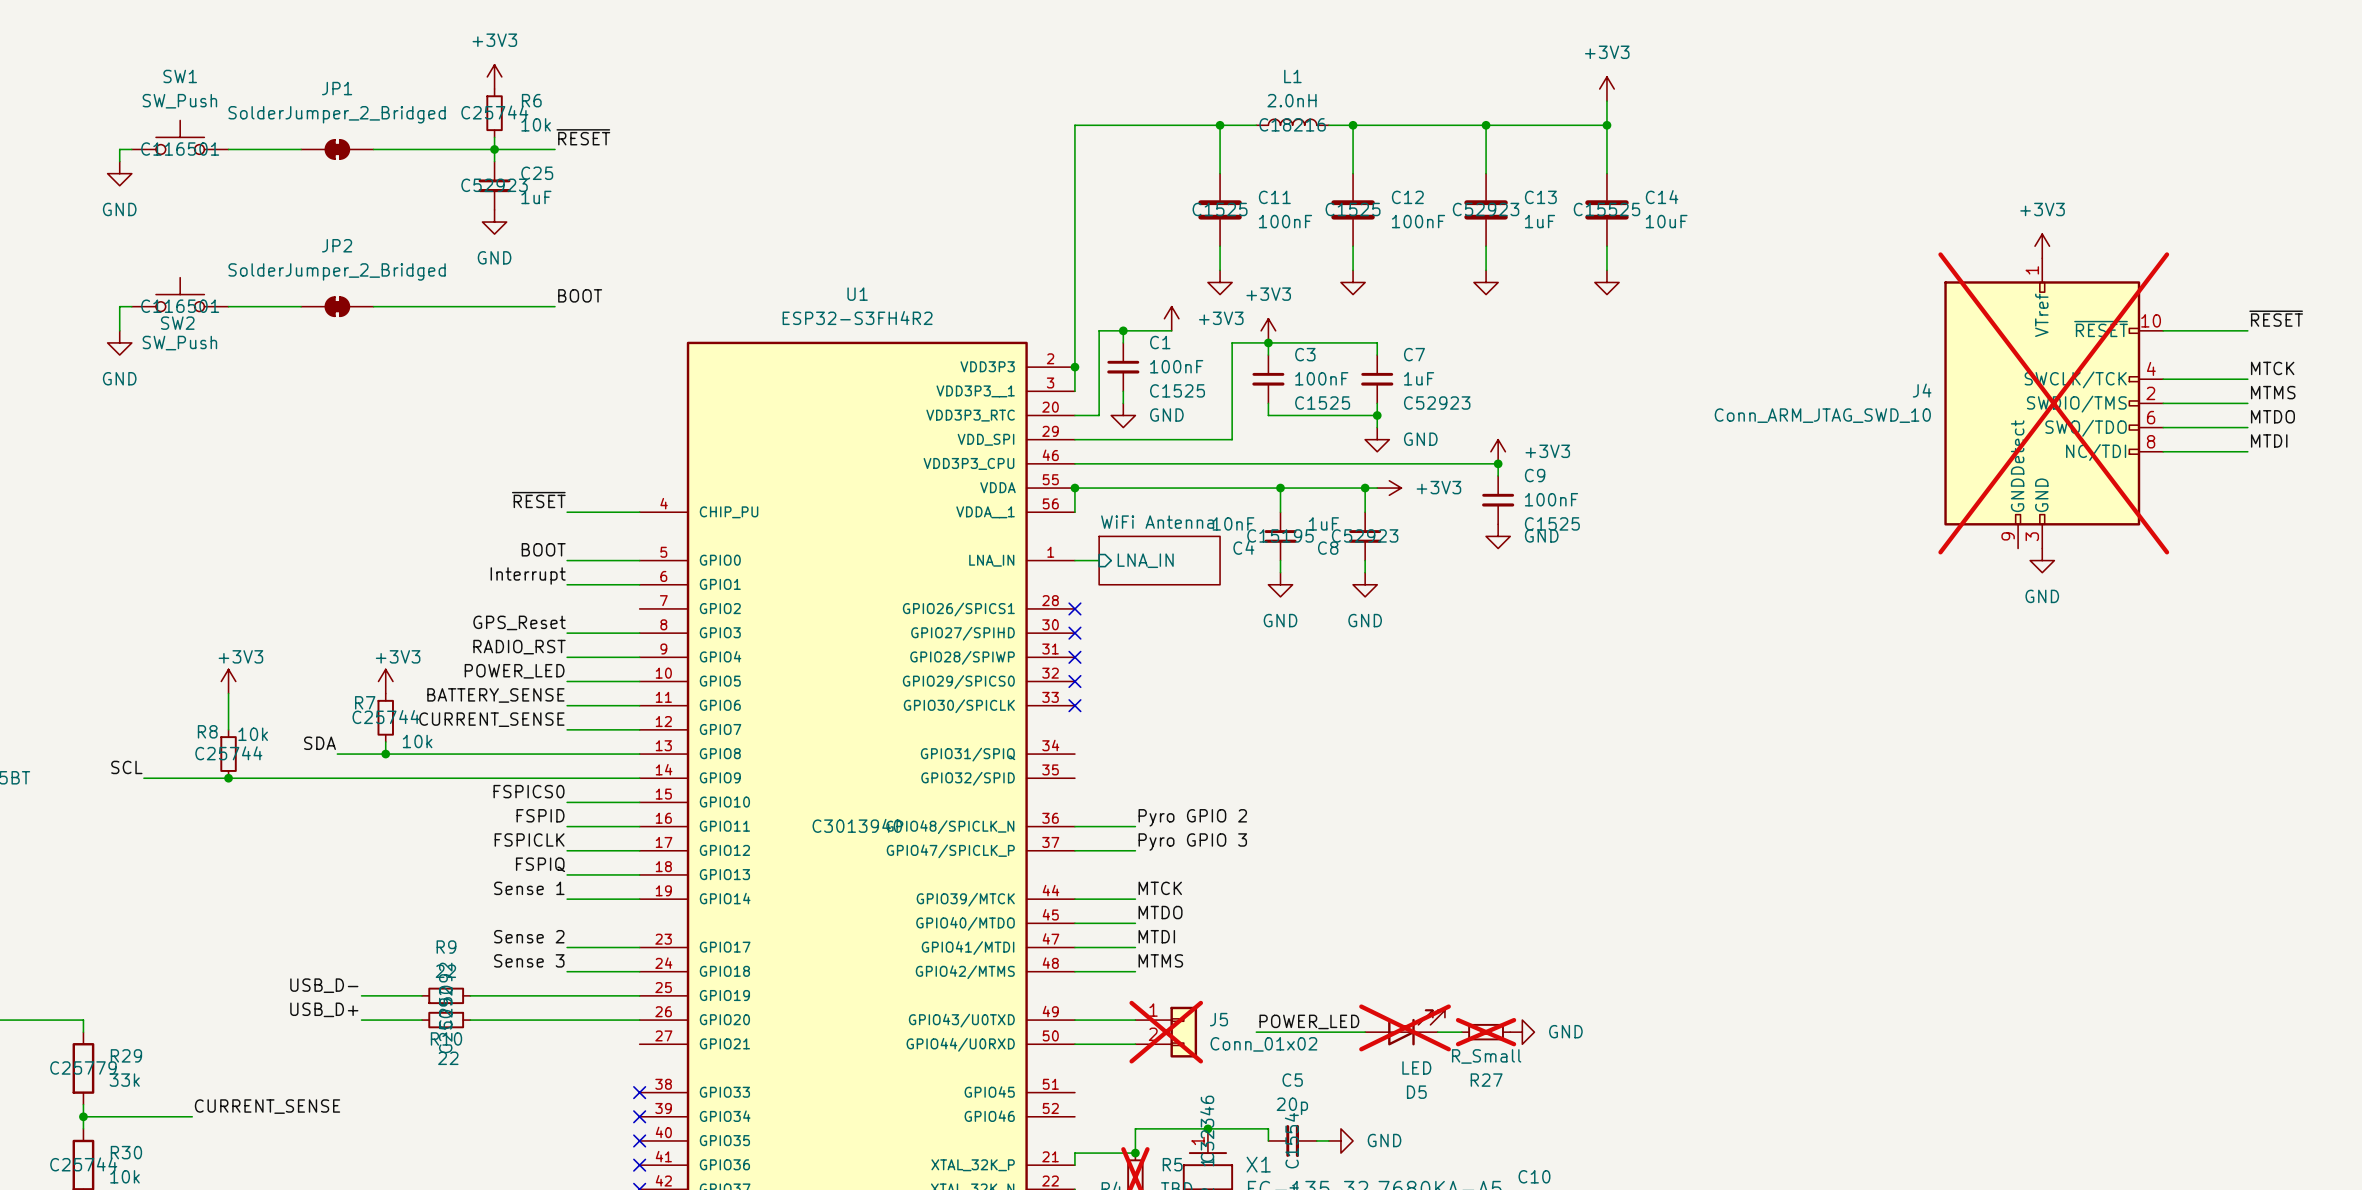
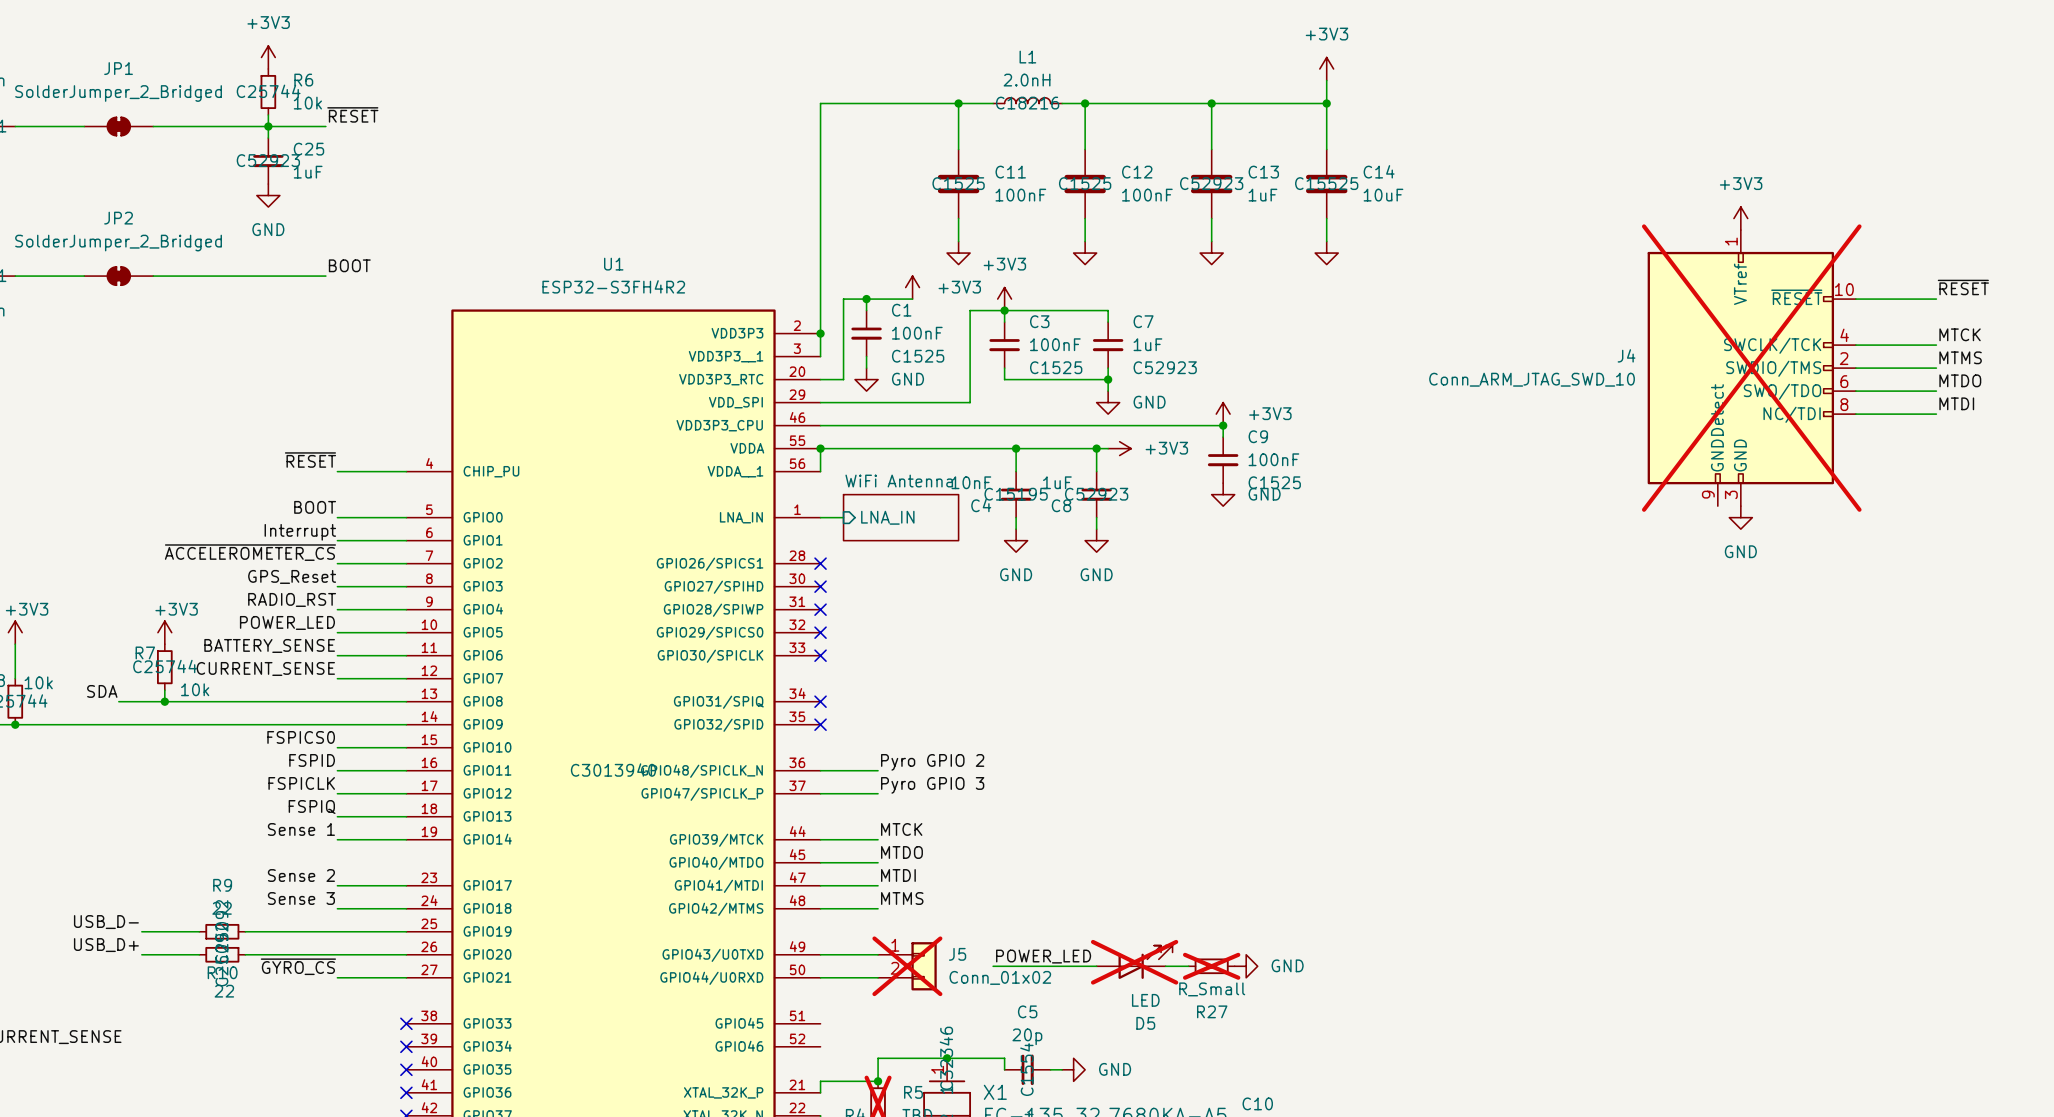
label: none -> ~{ACCELEROMETER_CS} (250, 552)
wire: none -> (337, 563) (406, 563)
no-connect mark: none -> (820, 701)
no-connect mark: none -> (820, 724)
label: none -> ~{GYRO_CS} (298, 966)
wire: none -> (337, 977) (406, 977)

